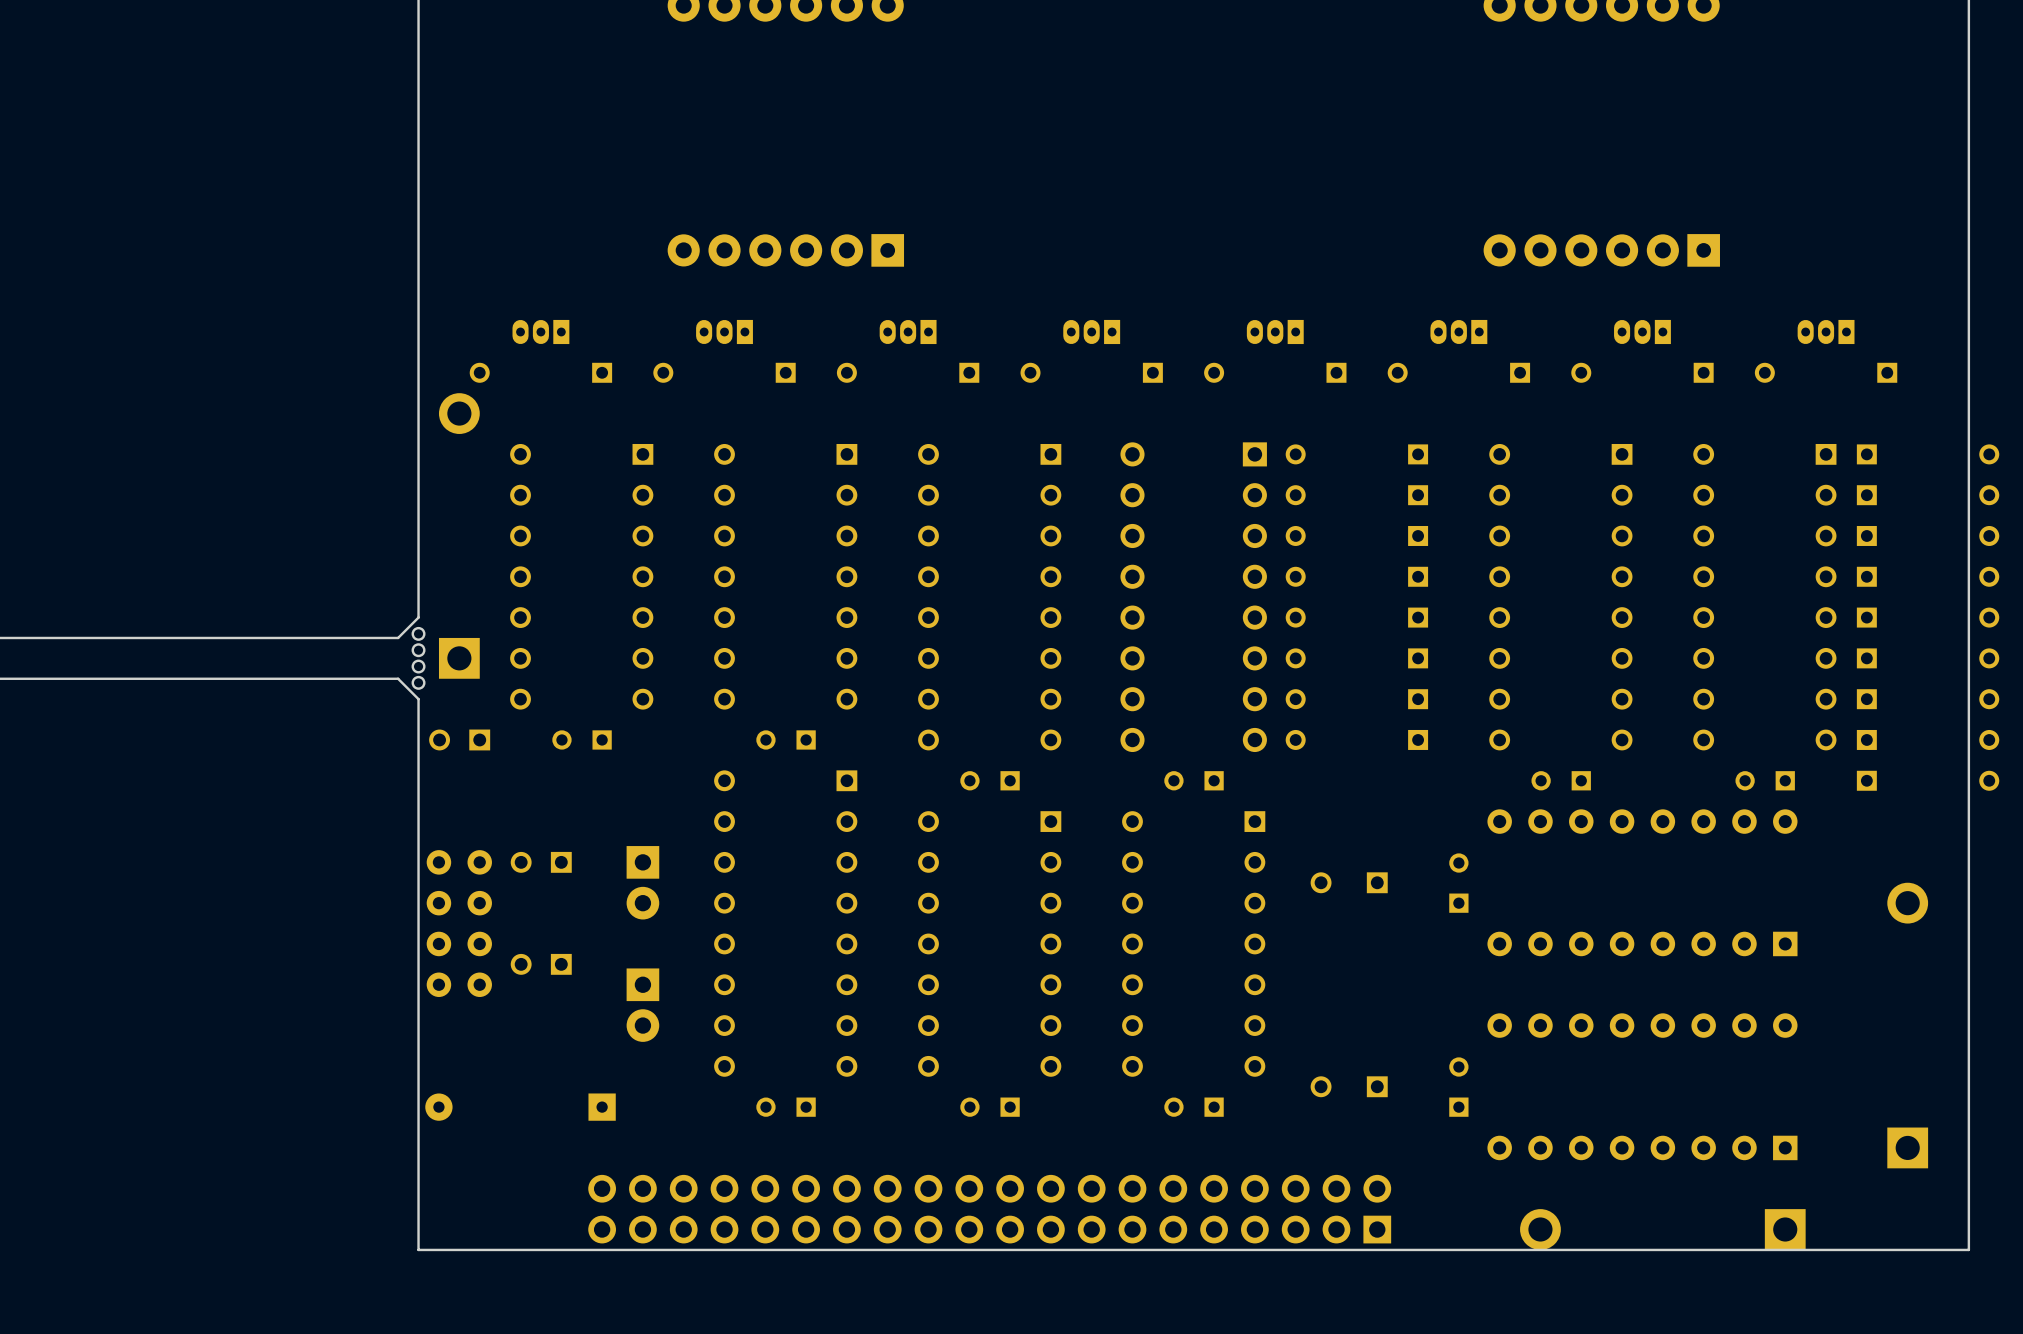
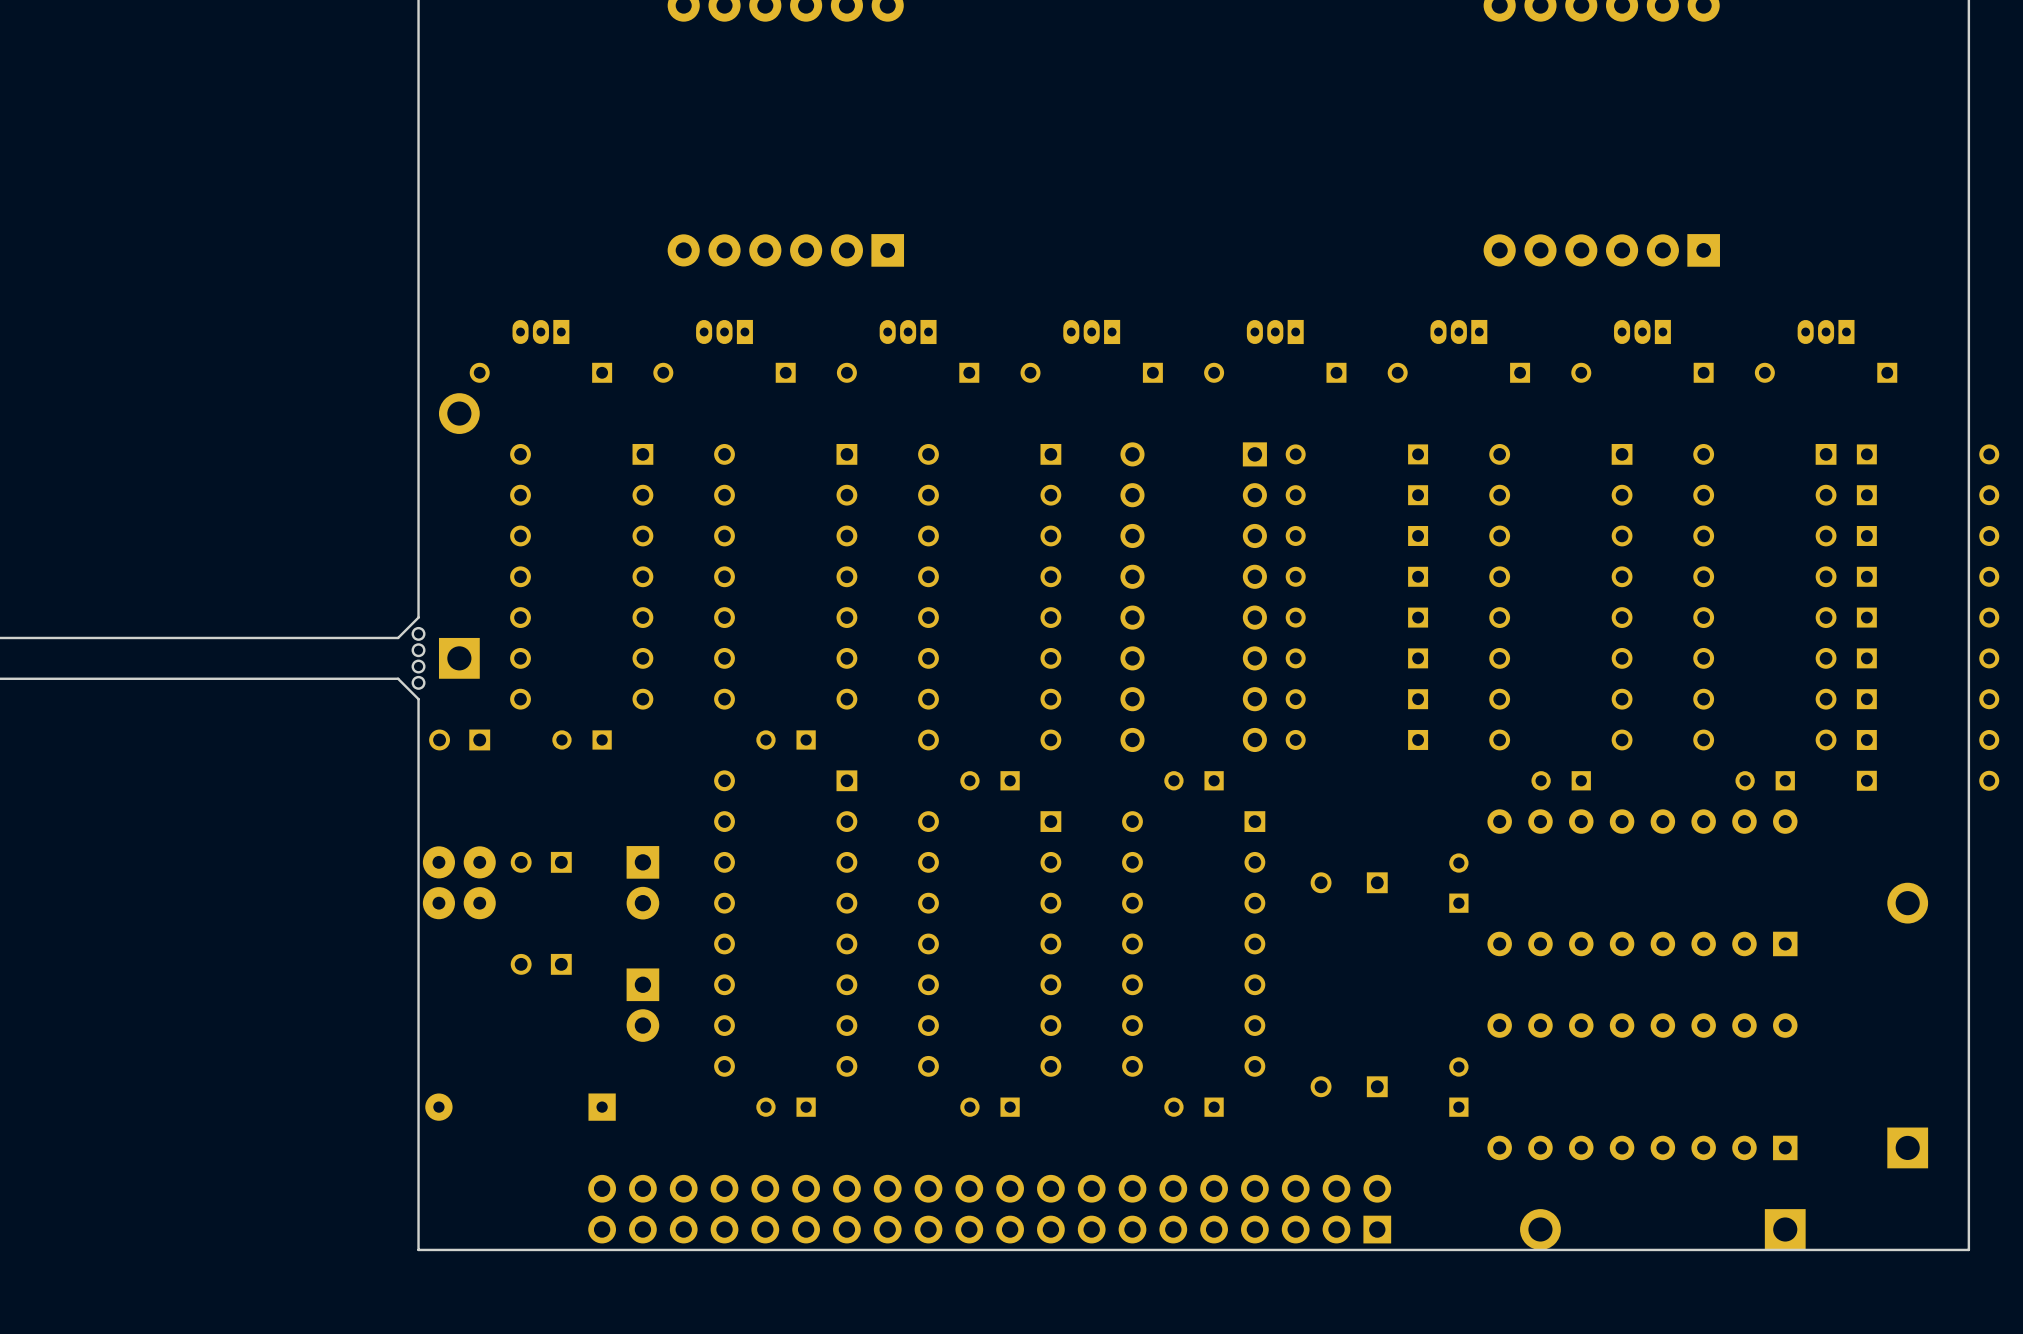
part: none -> (459, 882)
part: (459, 923) -> none

